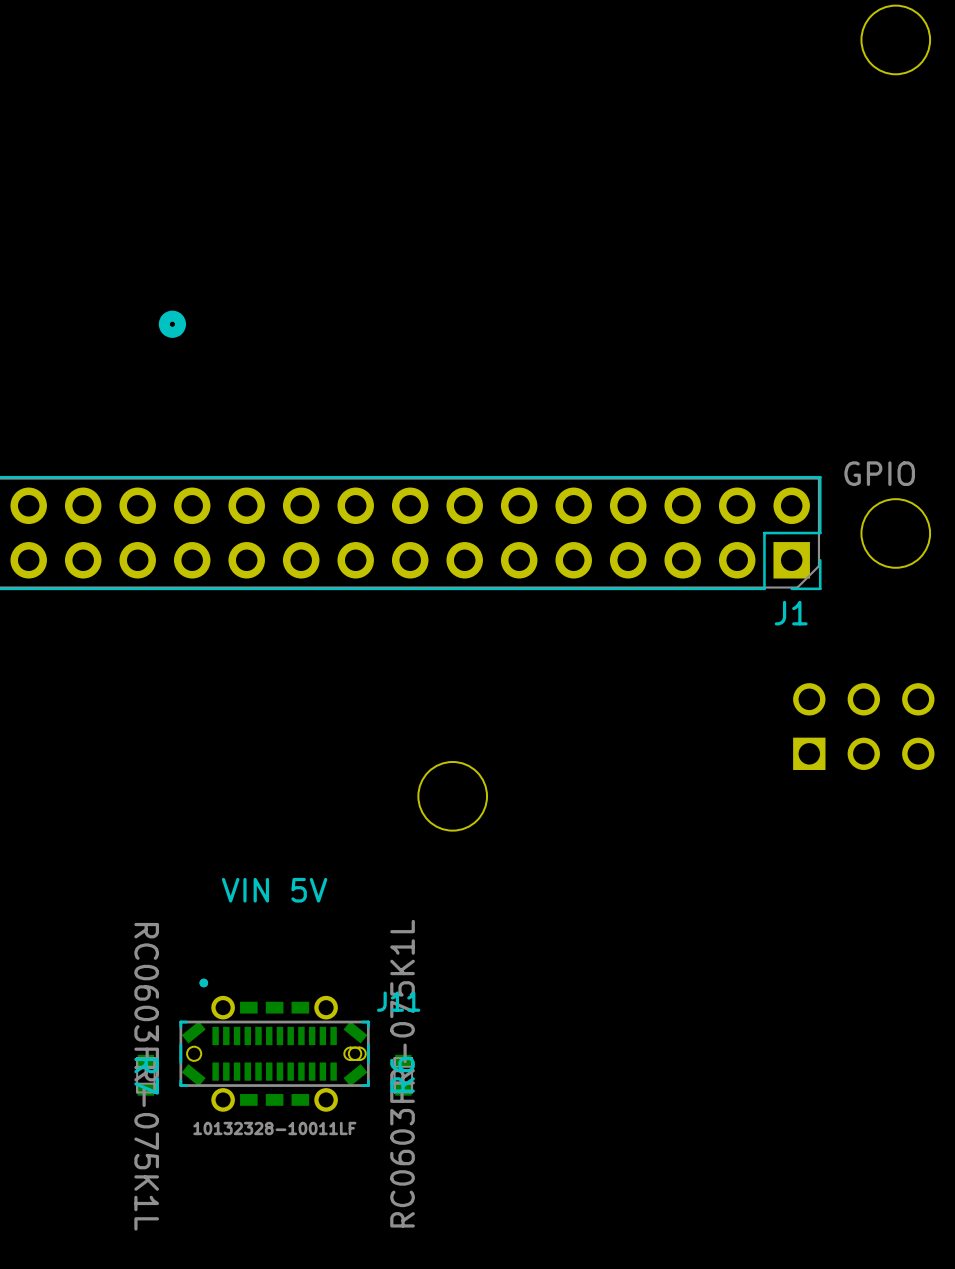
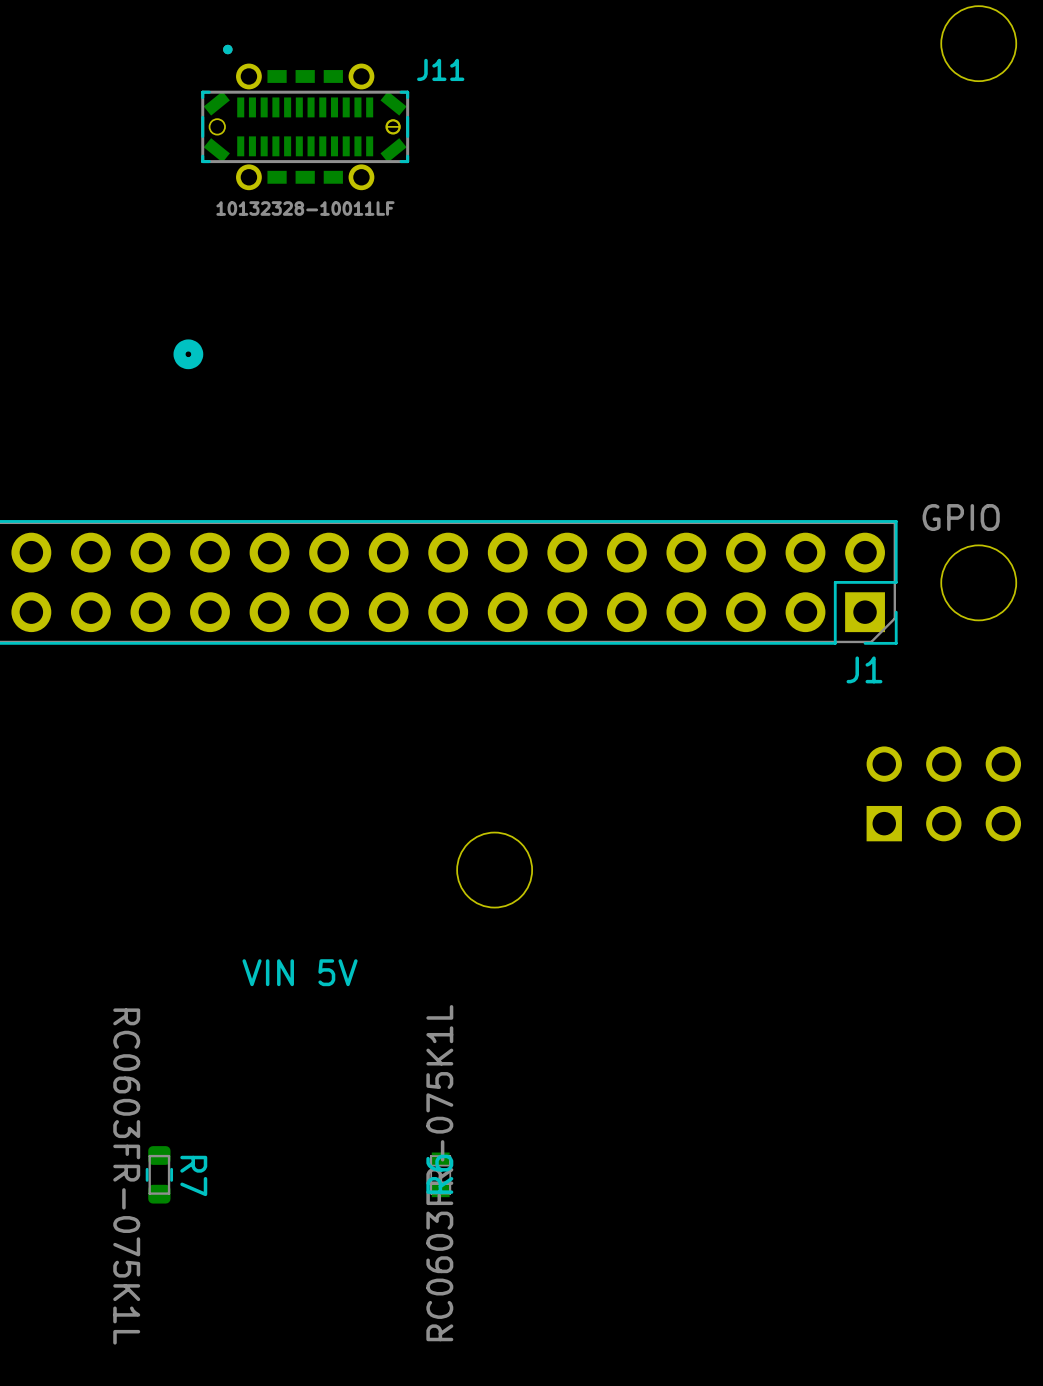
J11 footprint: [179, 978, 370, 1112] -> [201, 44, 410, 191]
R7 footprint: [136, 1054, 155, 1096] -> [145, 1146, 174, 1204]

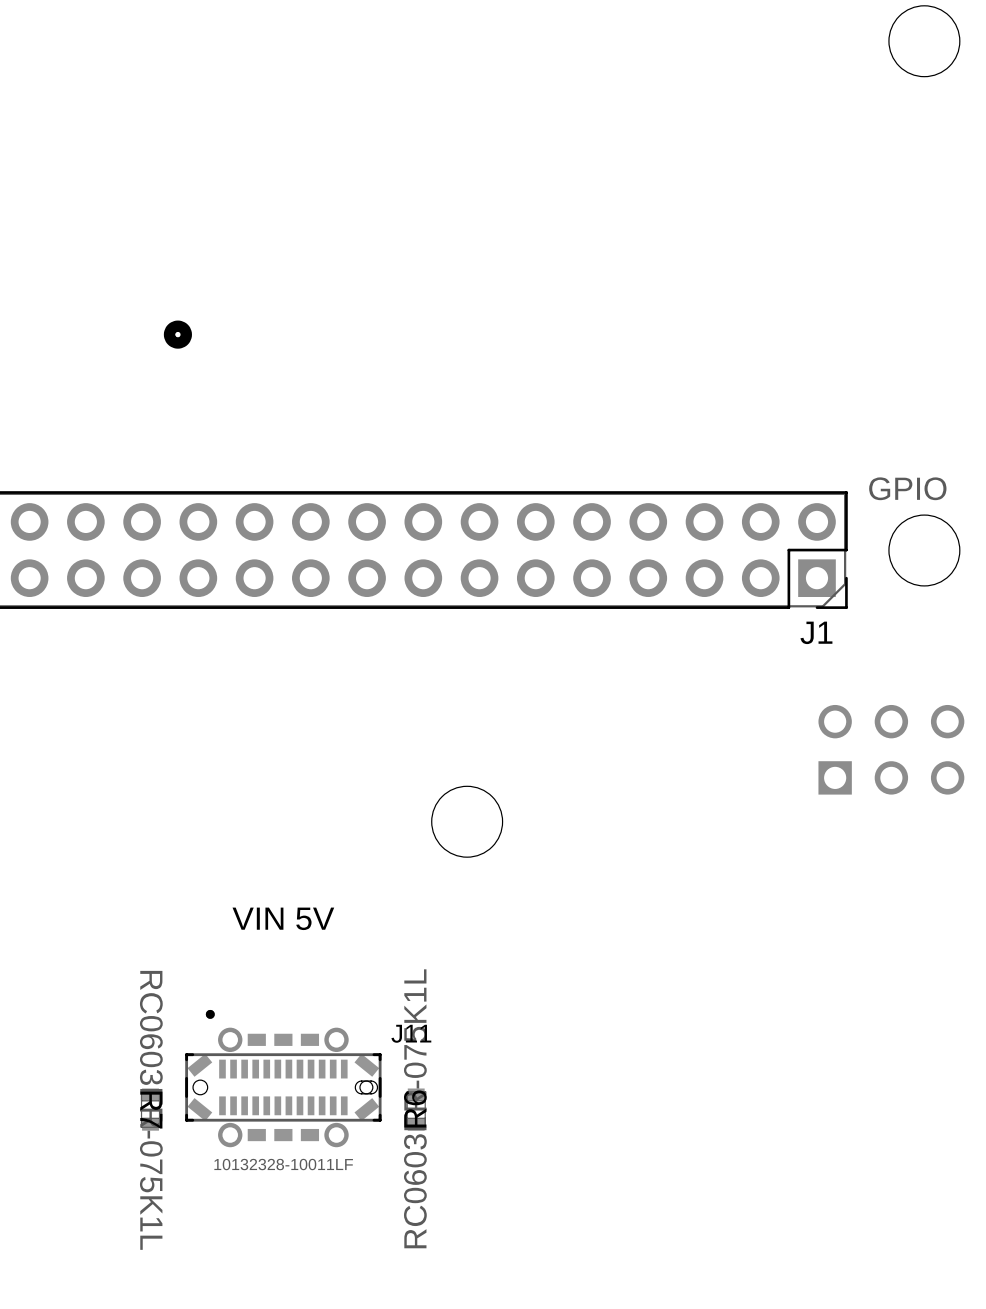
J11 footprint: [201, 44, 410, 191] -> [185, 1009, 382, 1148]
R7 footprint: [145, 1146, 174, 1204] -> [141, 1088, 160, 1131]

